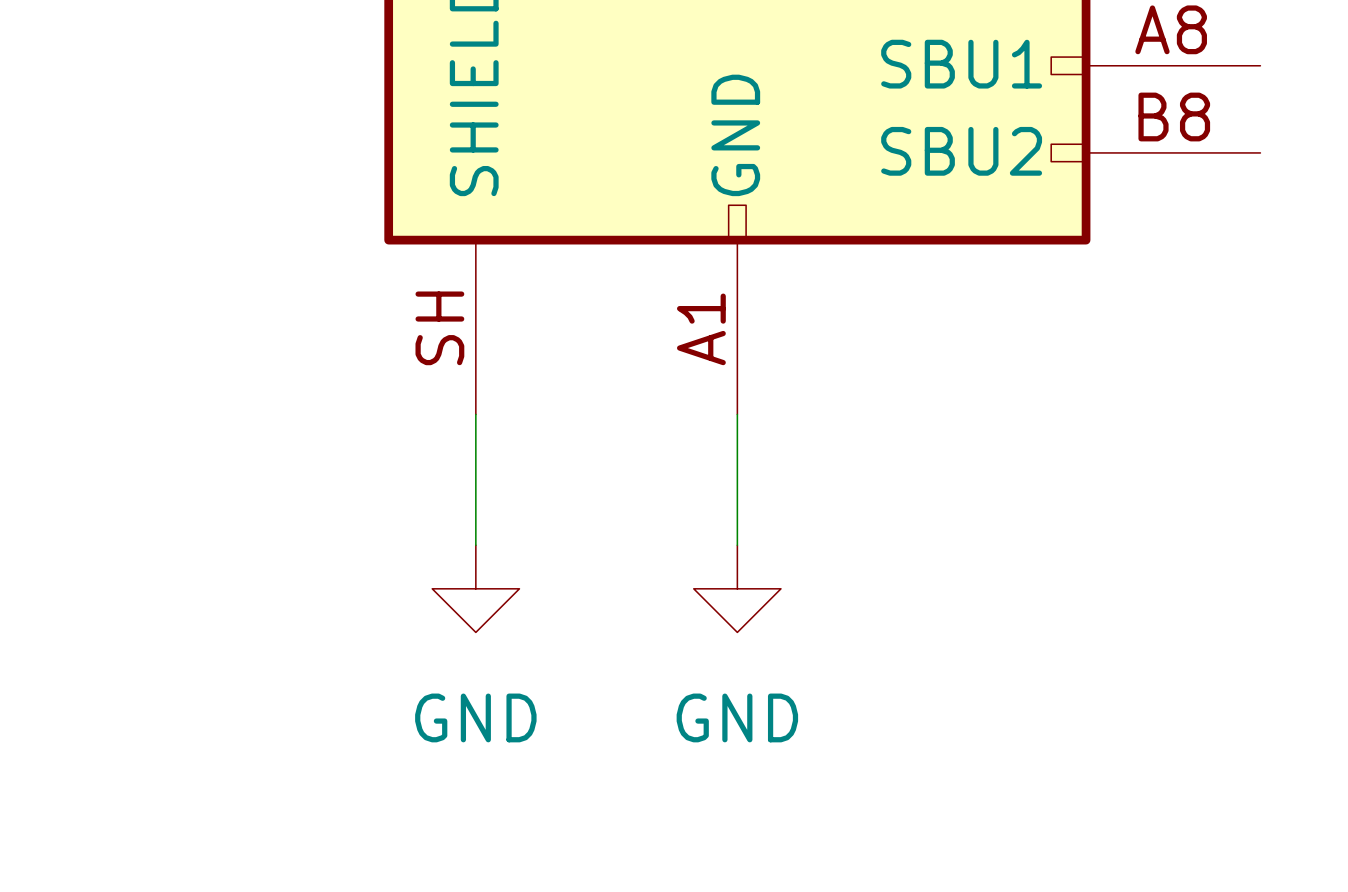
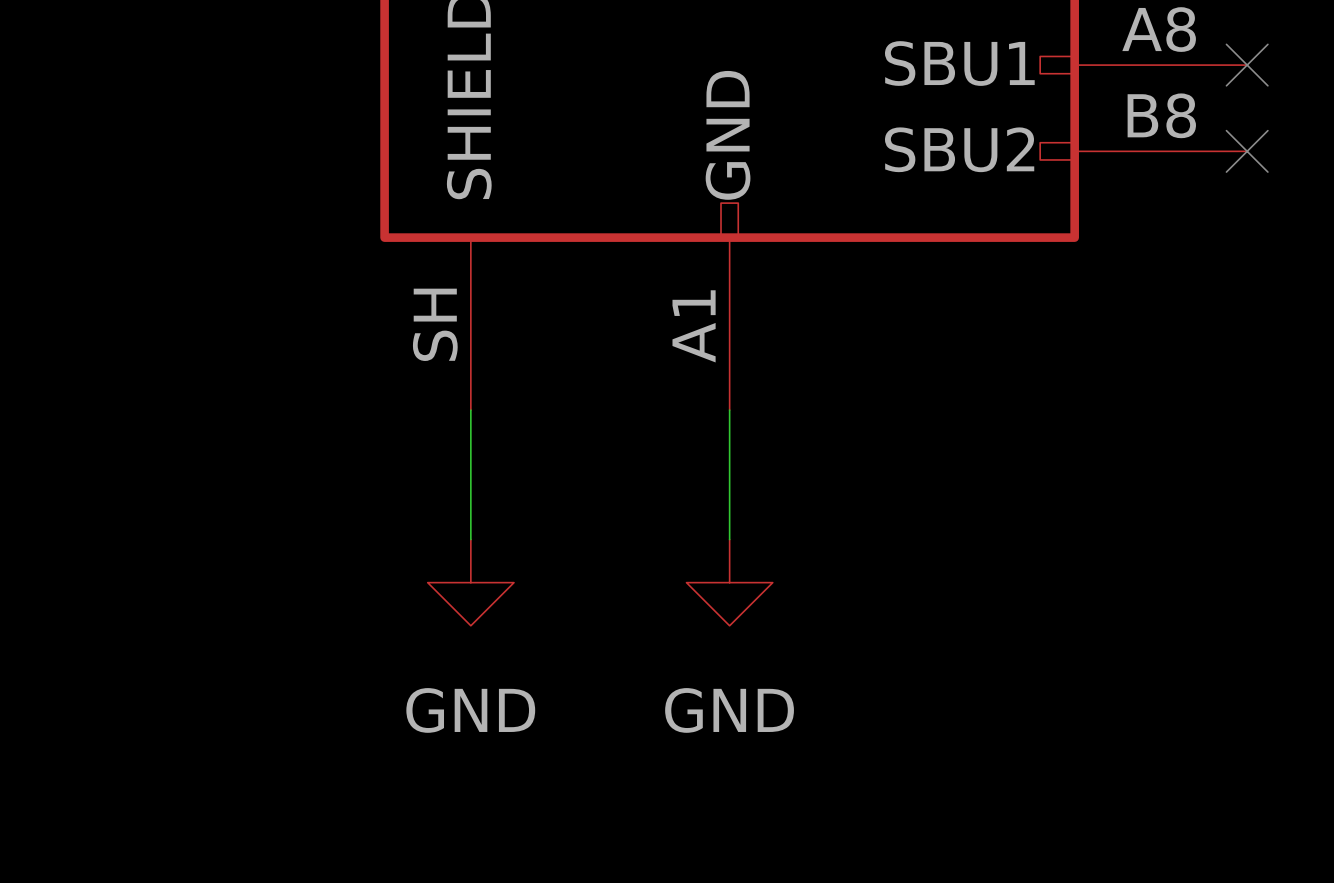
no-connect mark: none -> (1247, 65)
no-connect mark: none -> (1247, 151)

